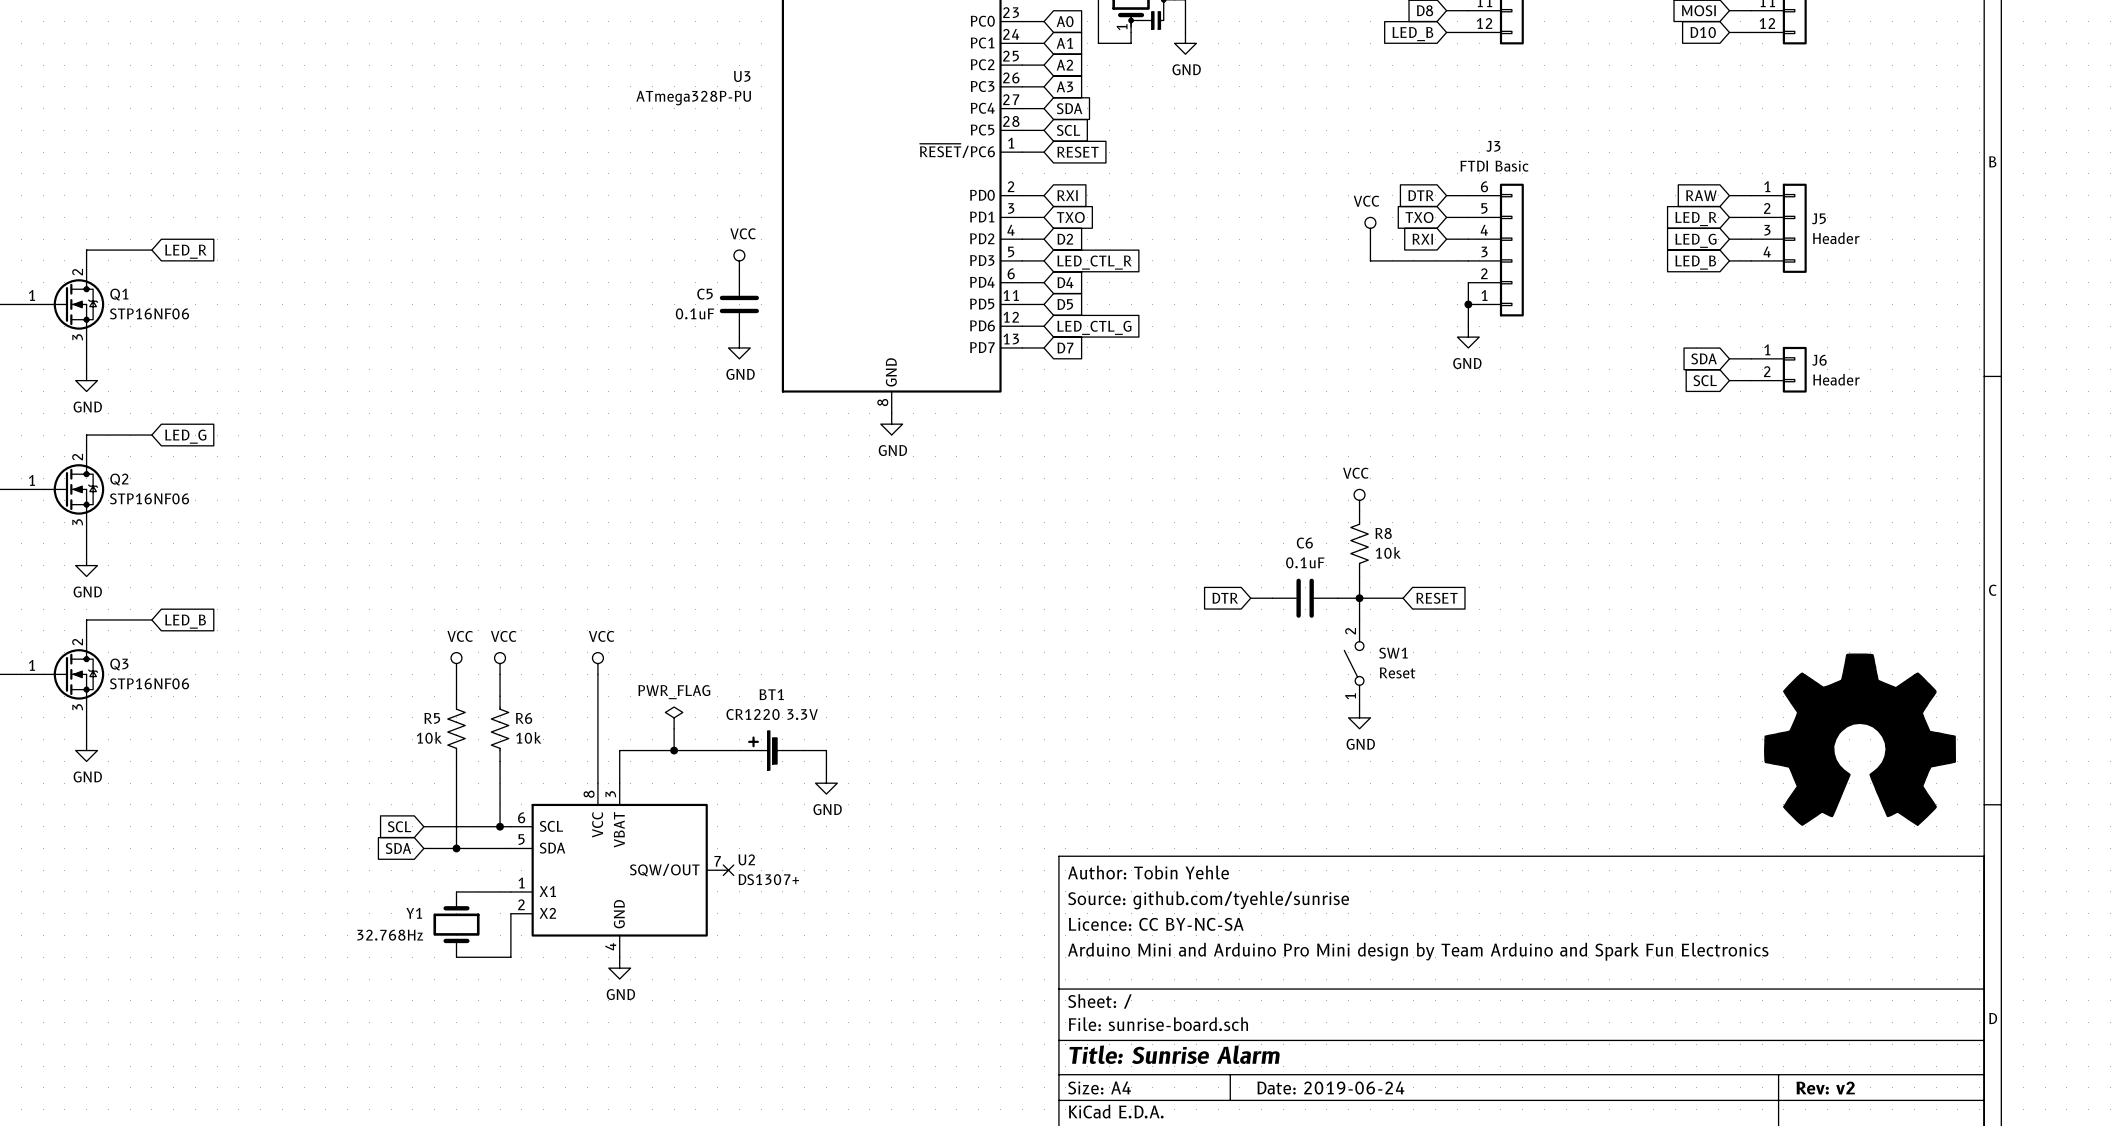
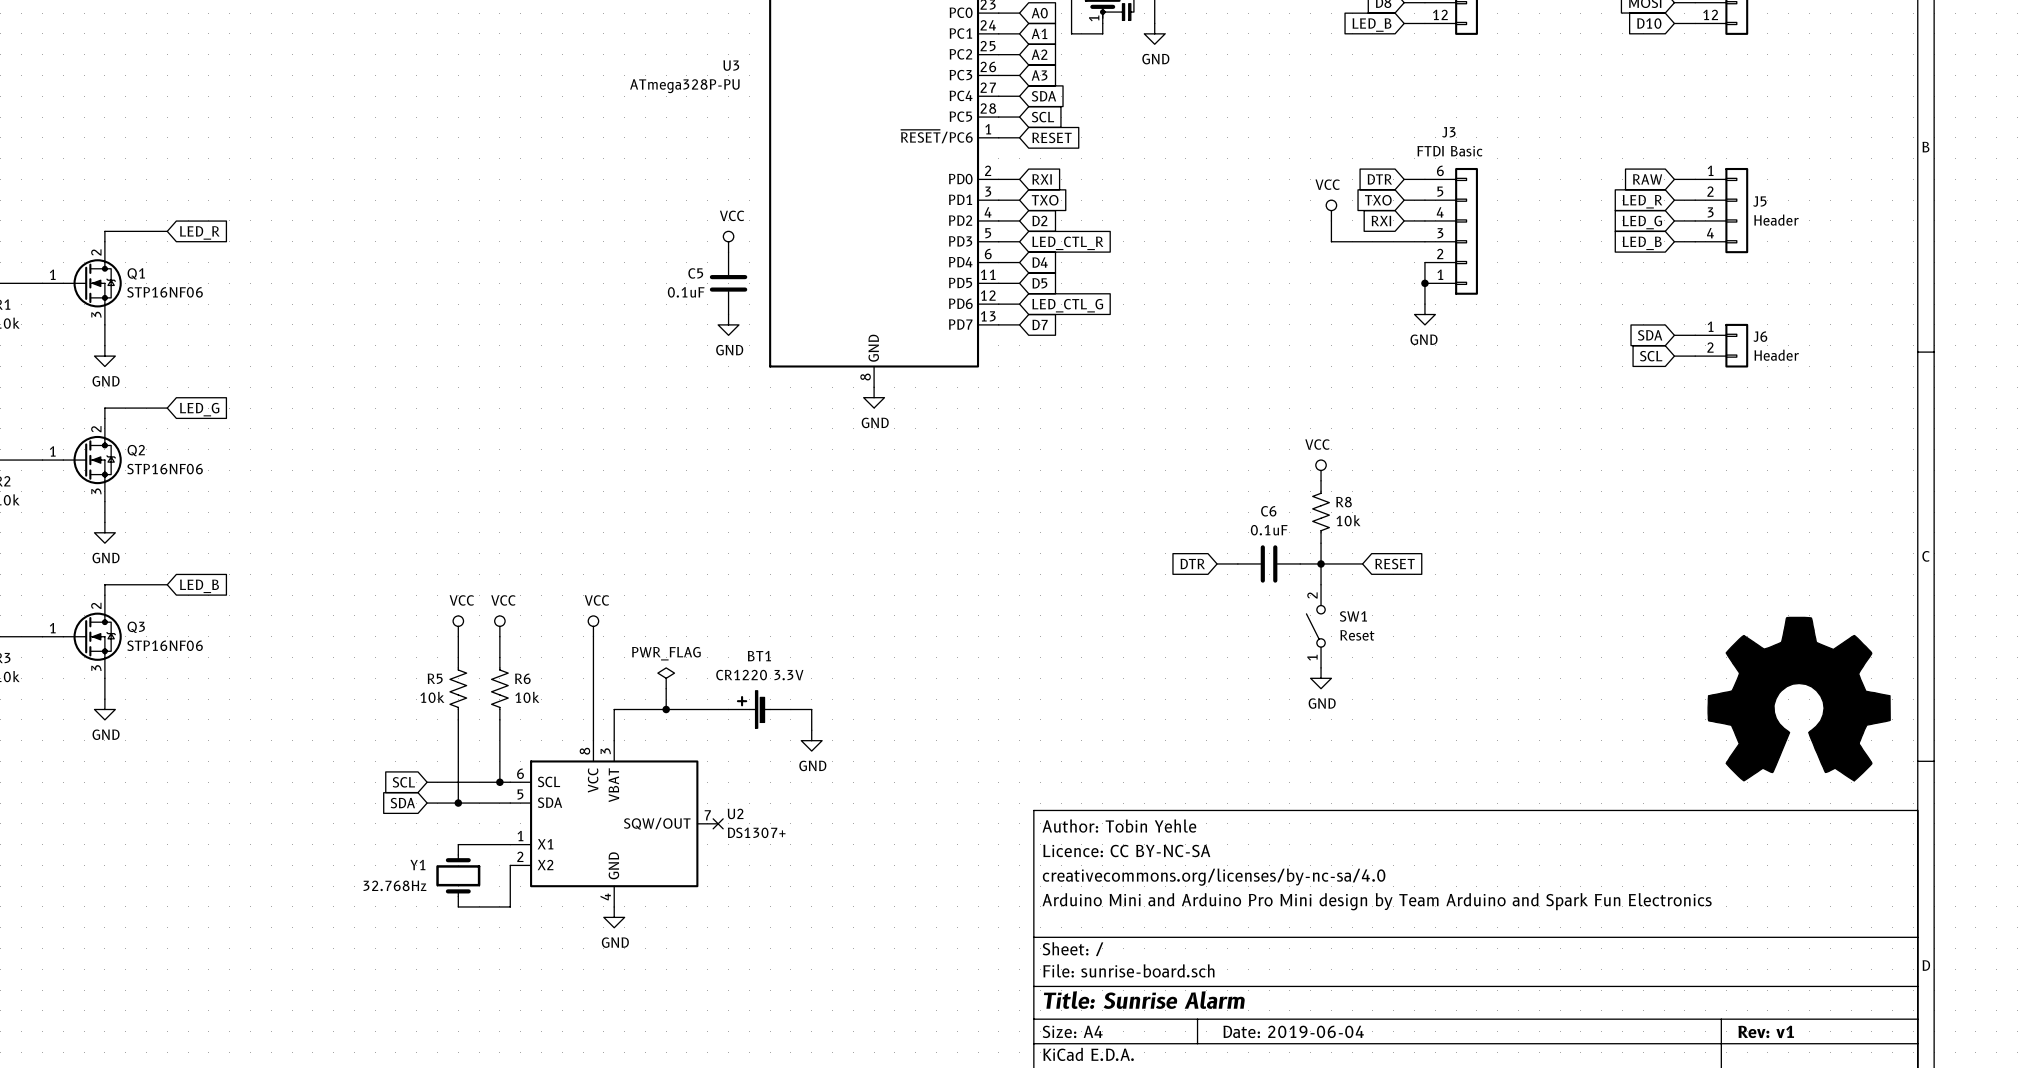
title block: Source: github.com/tyehle/sunrise (1208, 900) -> Licence: CC BY-NC-SA (1126, 851)
title block: Licence: CC BY-NC-SA (1156, 924) -> creativecommons.org/licenses/by-nc-sa/4.0 (1214, 877)
title block: Date: 2019-06-24 (1330, 1088) -> Date: 2019-06-04 (1293, 1031)
title block: Rev: v2 (1825, 1088) -> Rev: v1 (1766, 1031)

